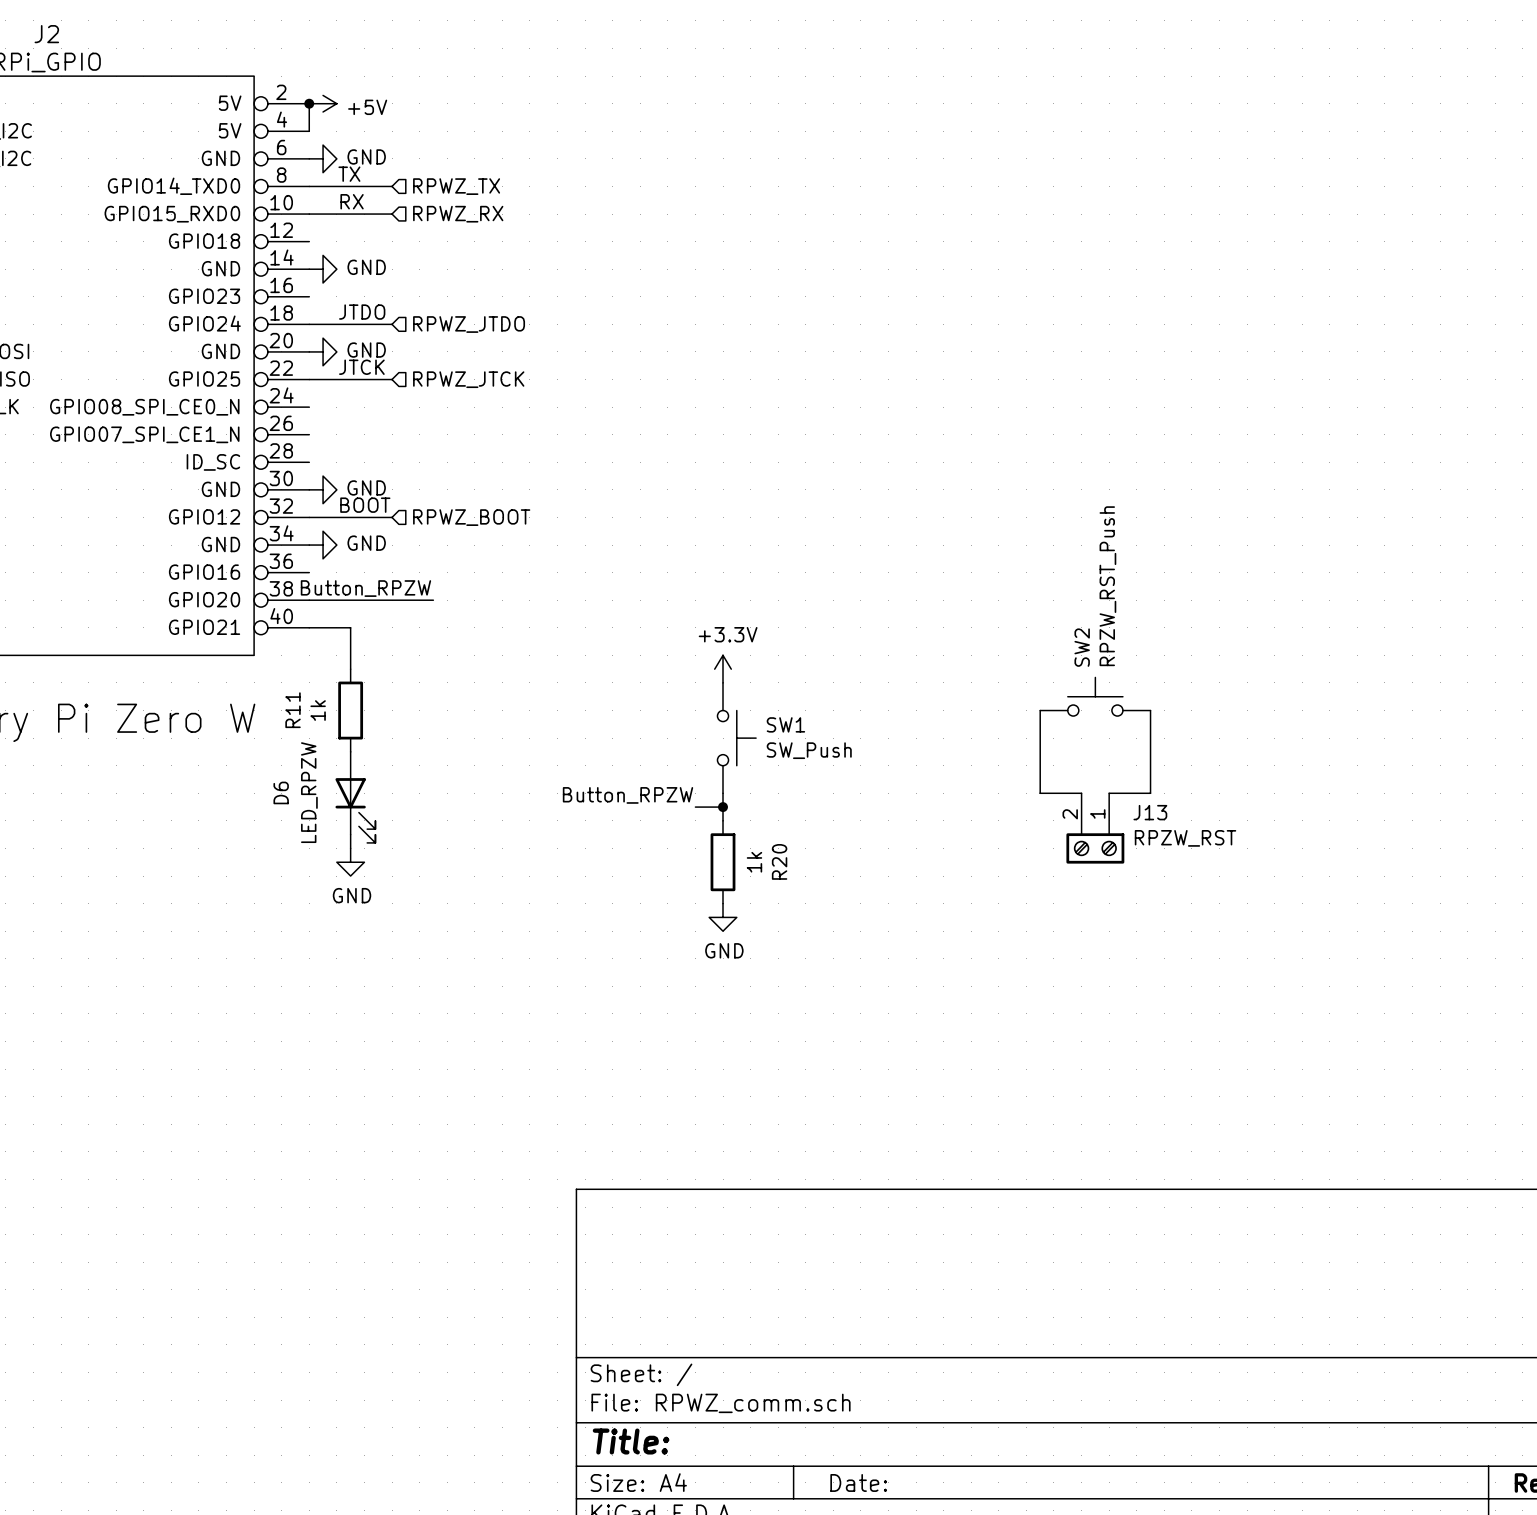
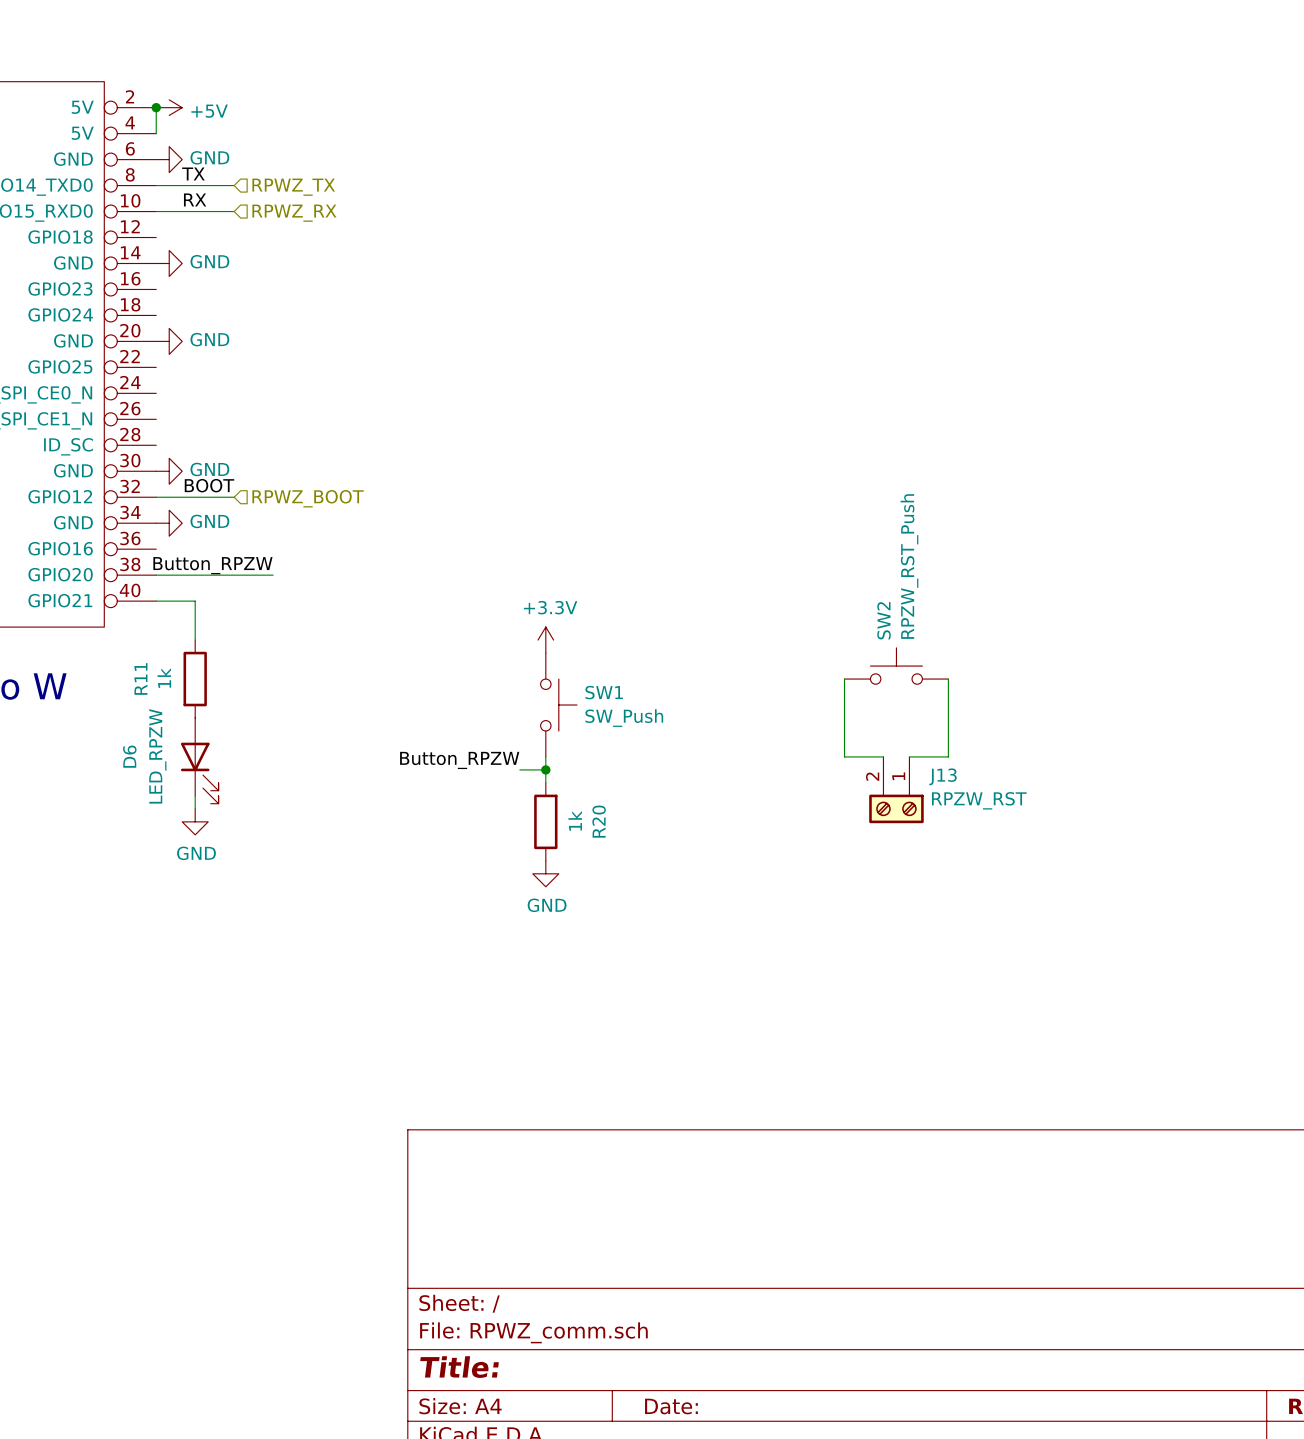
label: JTDO (362, 312) -> none
wire: (309, 324) (392, 324) -> none
hierarchical label: RPWZ_JTDO (469, 324) -> none
label: JTCK (361, 367) -> none
wire: (309, 379) (392, 379) -> none
hierarchical label: RPWZ_JTCK (468, 379) -> none

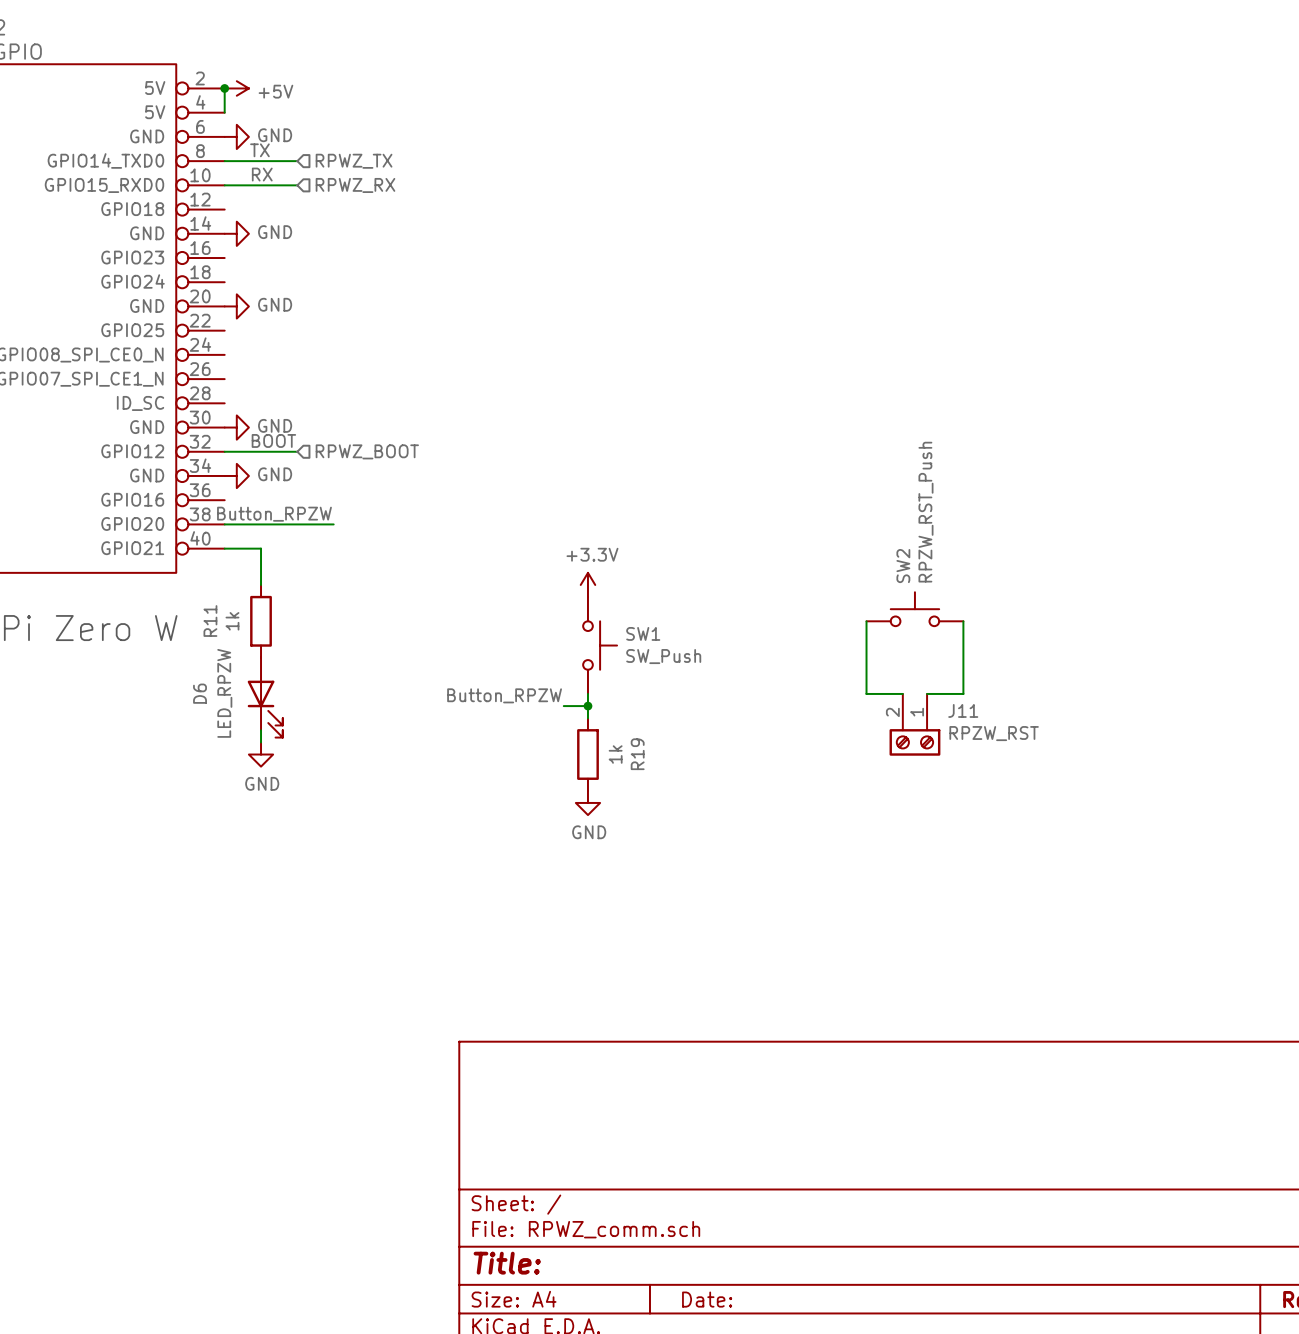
J13 name: J13 (942, 776) -> J11 (963, 710)
R20 name: R20 (599, 821) -> R19 (637, 754)

